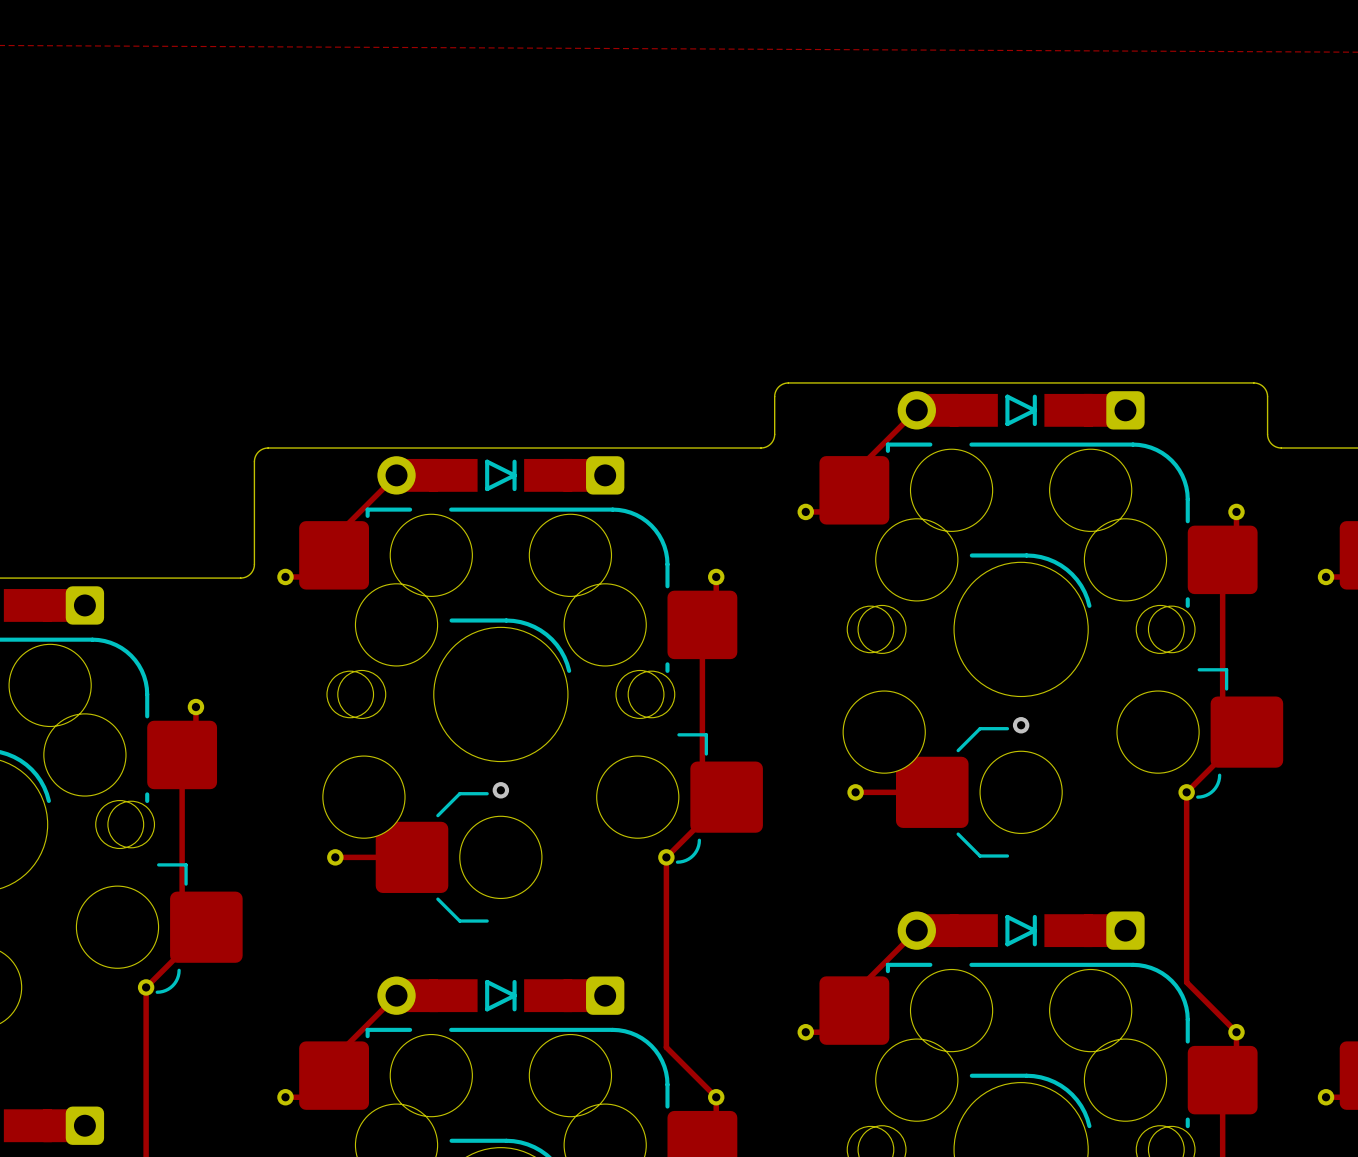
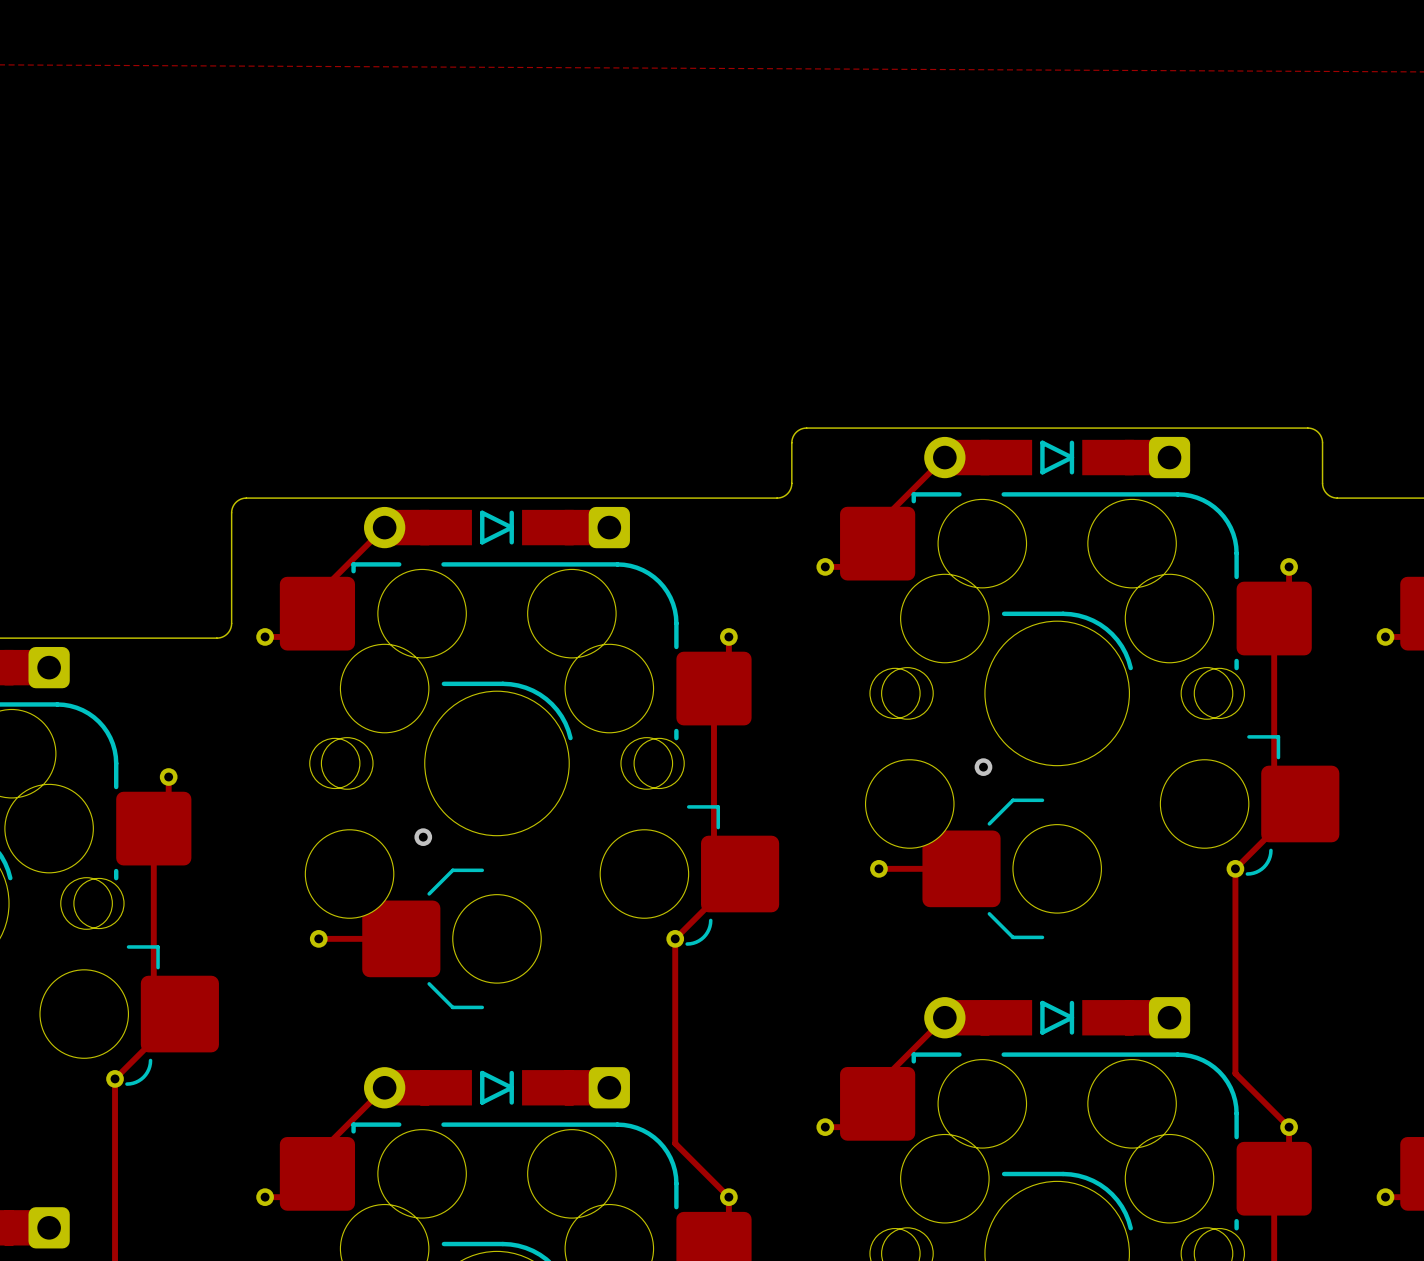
via position: (1021, 725) -> (983, 767)
via position: (500, 790) -> (423, 837)

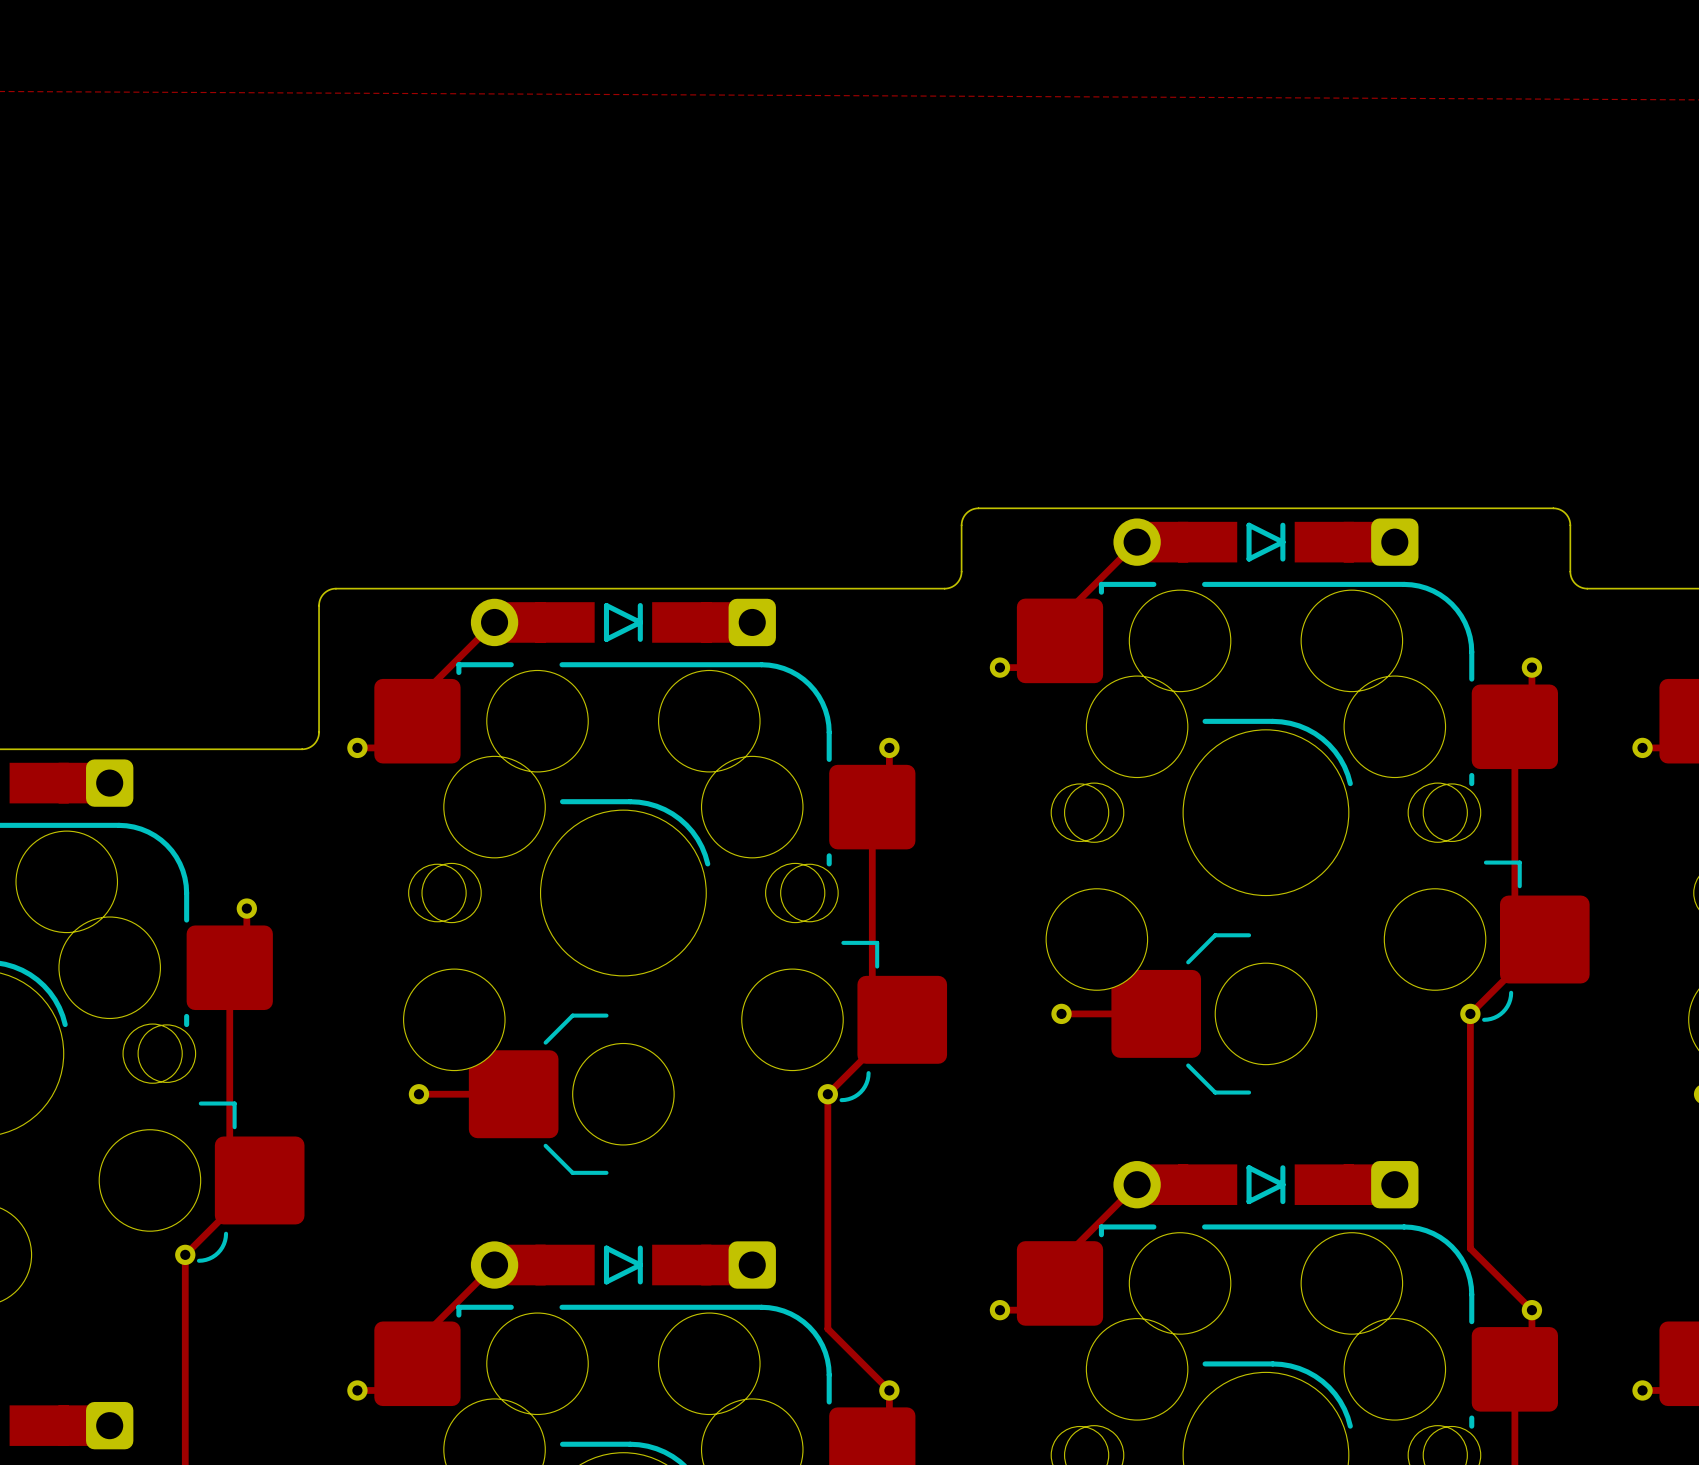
via: (983, 767) -> none
via: (423, 837) -> none

